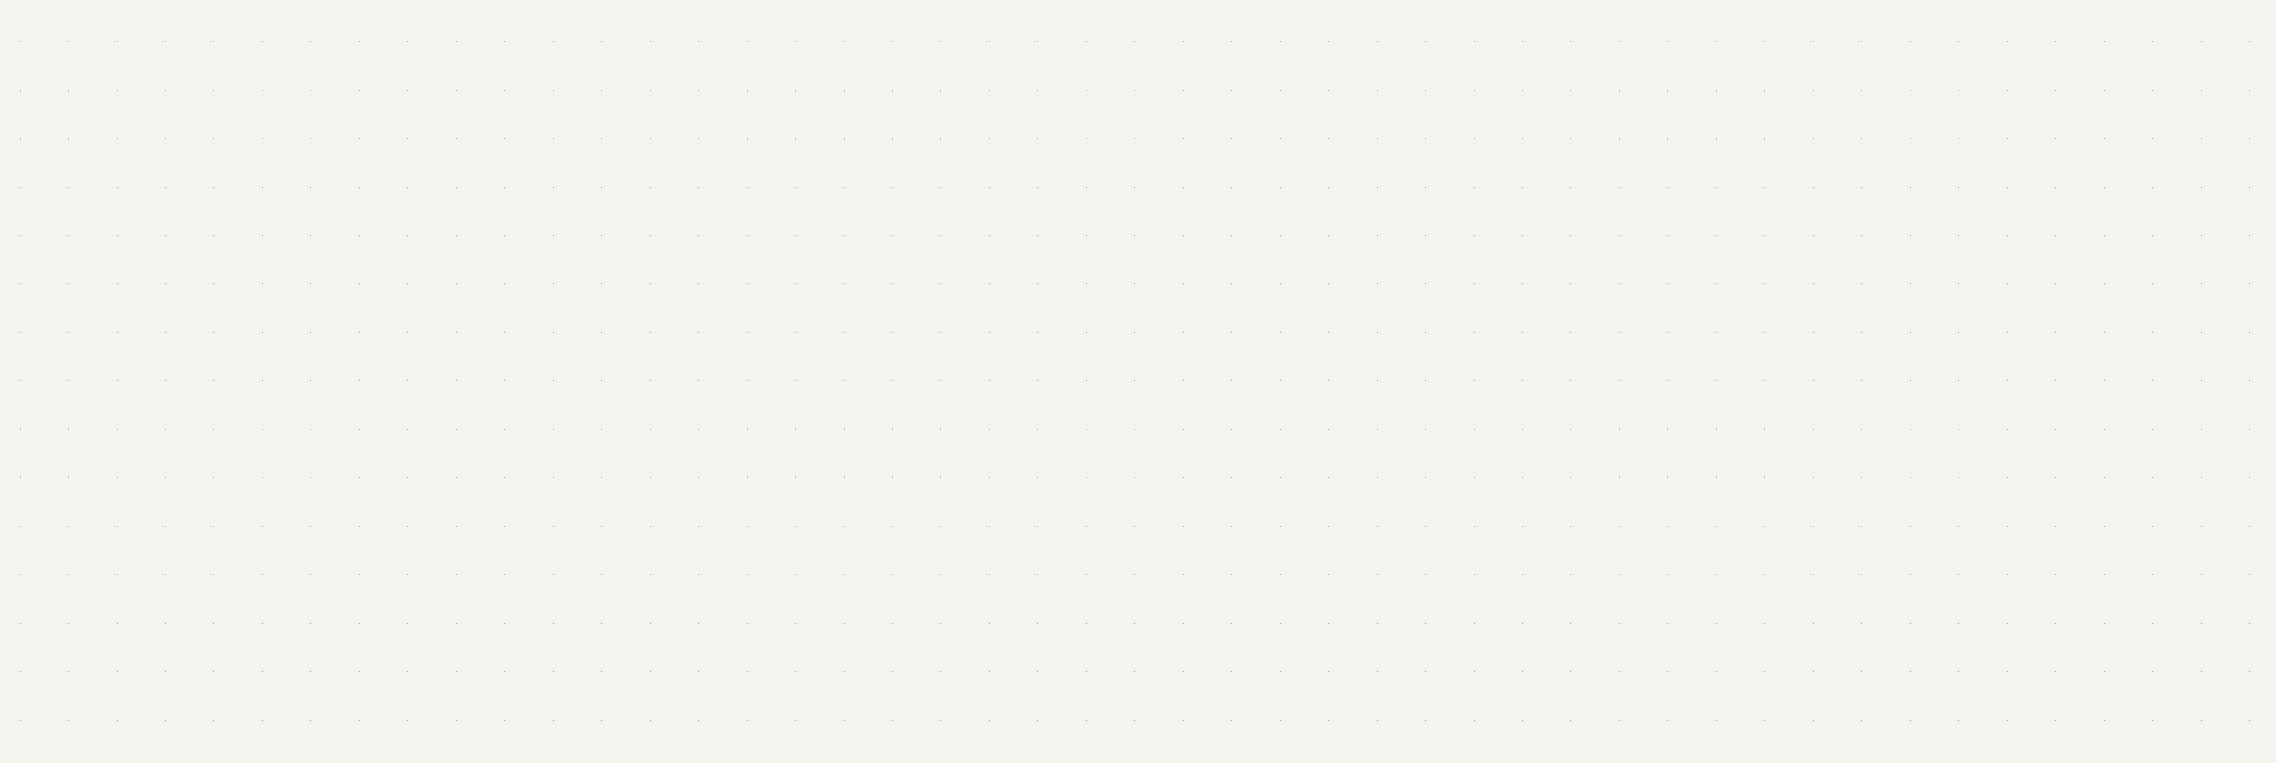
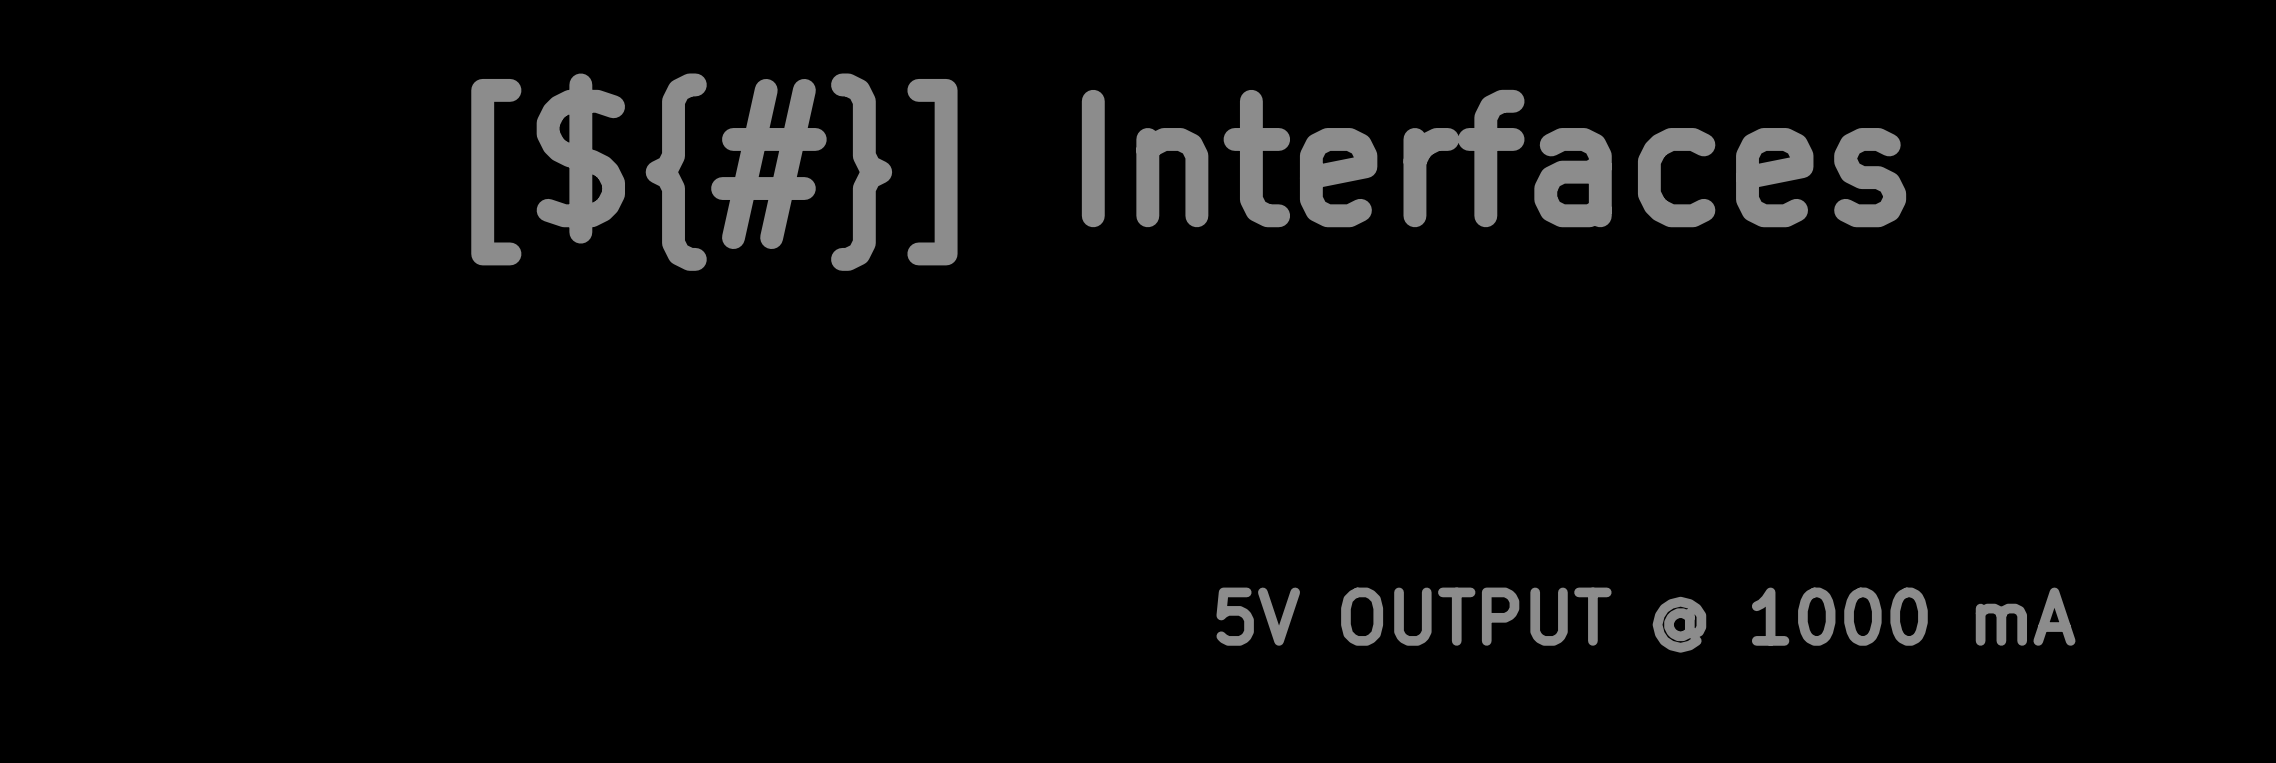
text: none -> [${#}] Interfaces (1188, 172)
text: none -> 5V OUTPUT @ 1000 mA (1645, 620)

